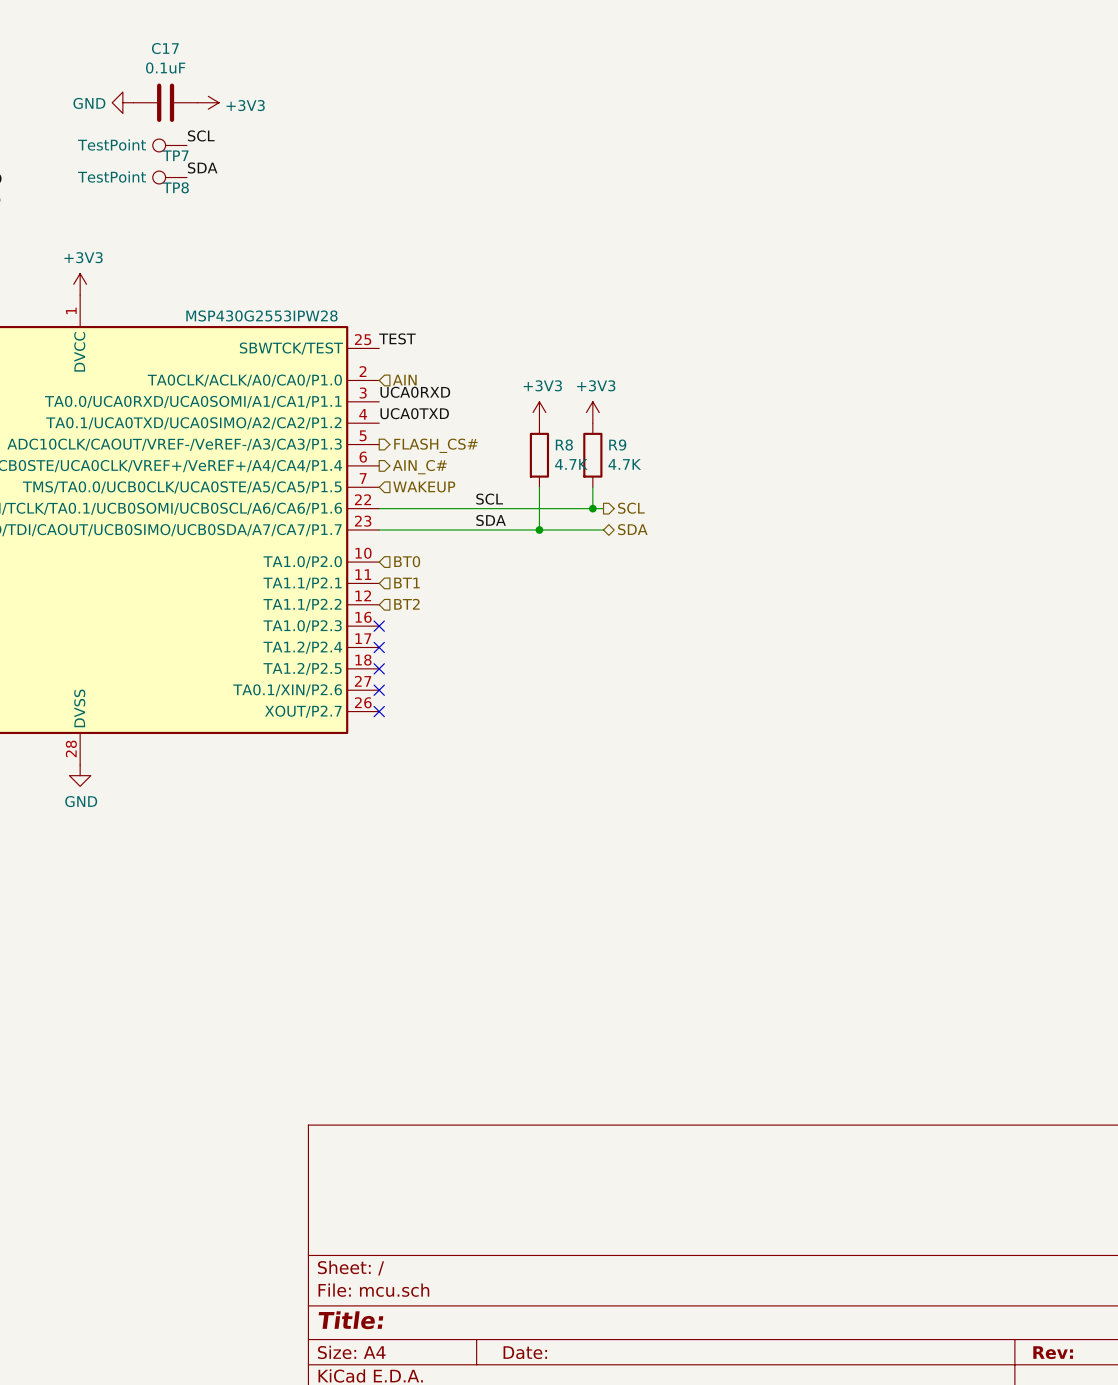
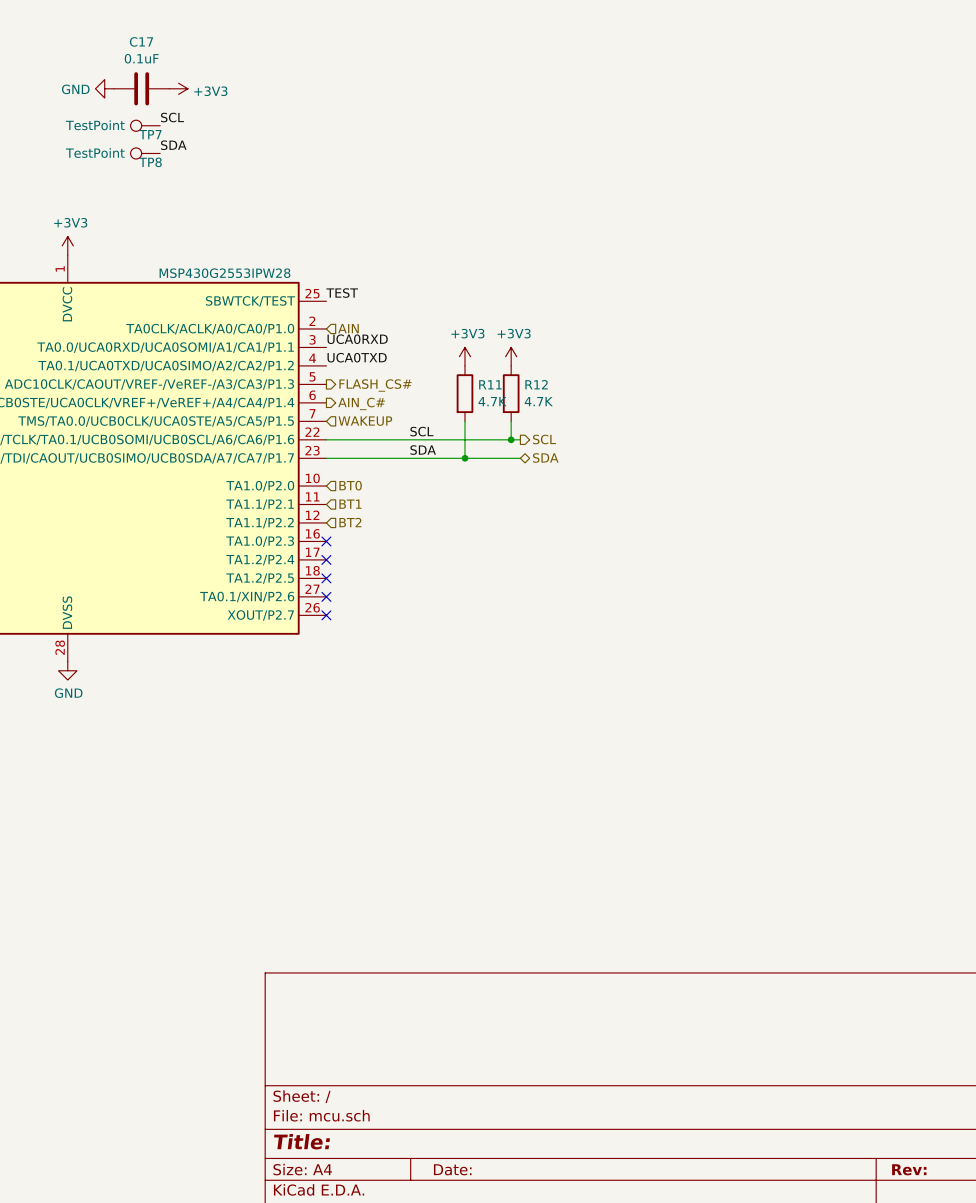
R8 name: R8 (564, 445) -> R11 (490, 384)
R9 name: R9 (617, 445) -> R12 (536, 384)

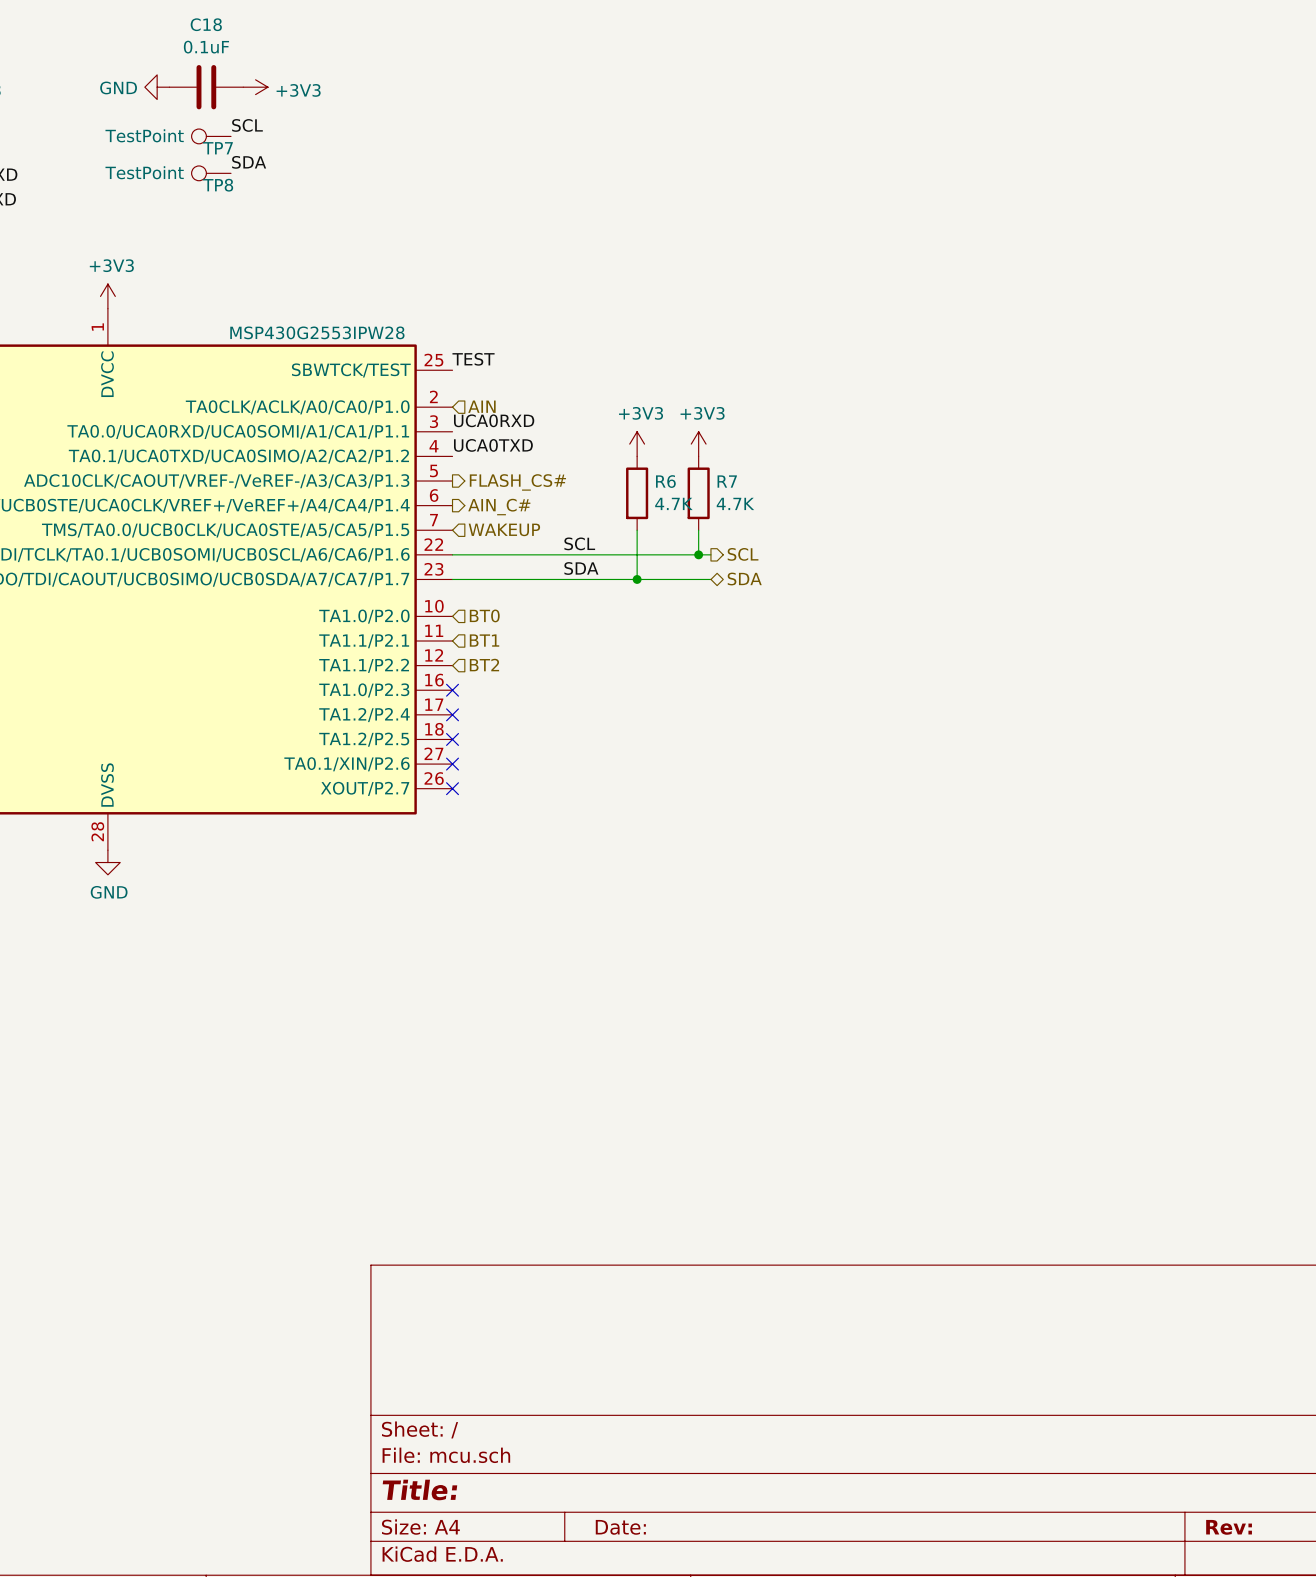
C17 name: C17 (141, 41) -> C18 (206, 24)
R11 name: R11 (490, 384) -> R6 (665, 481)
R12 name: R12 (536, 384) -> R7 (727, 481)

